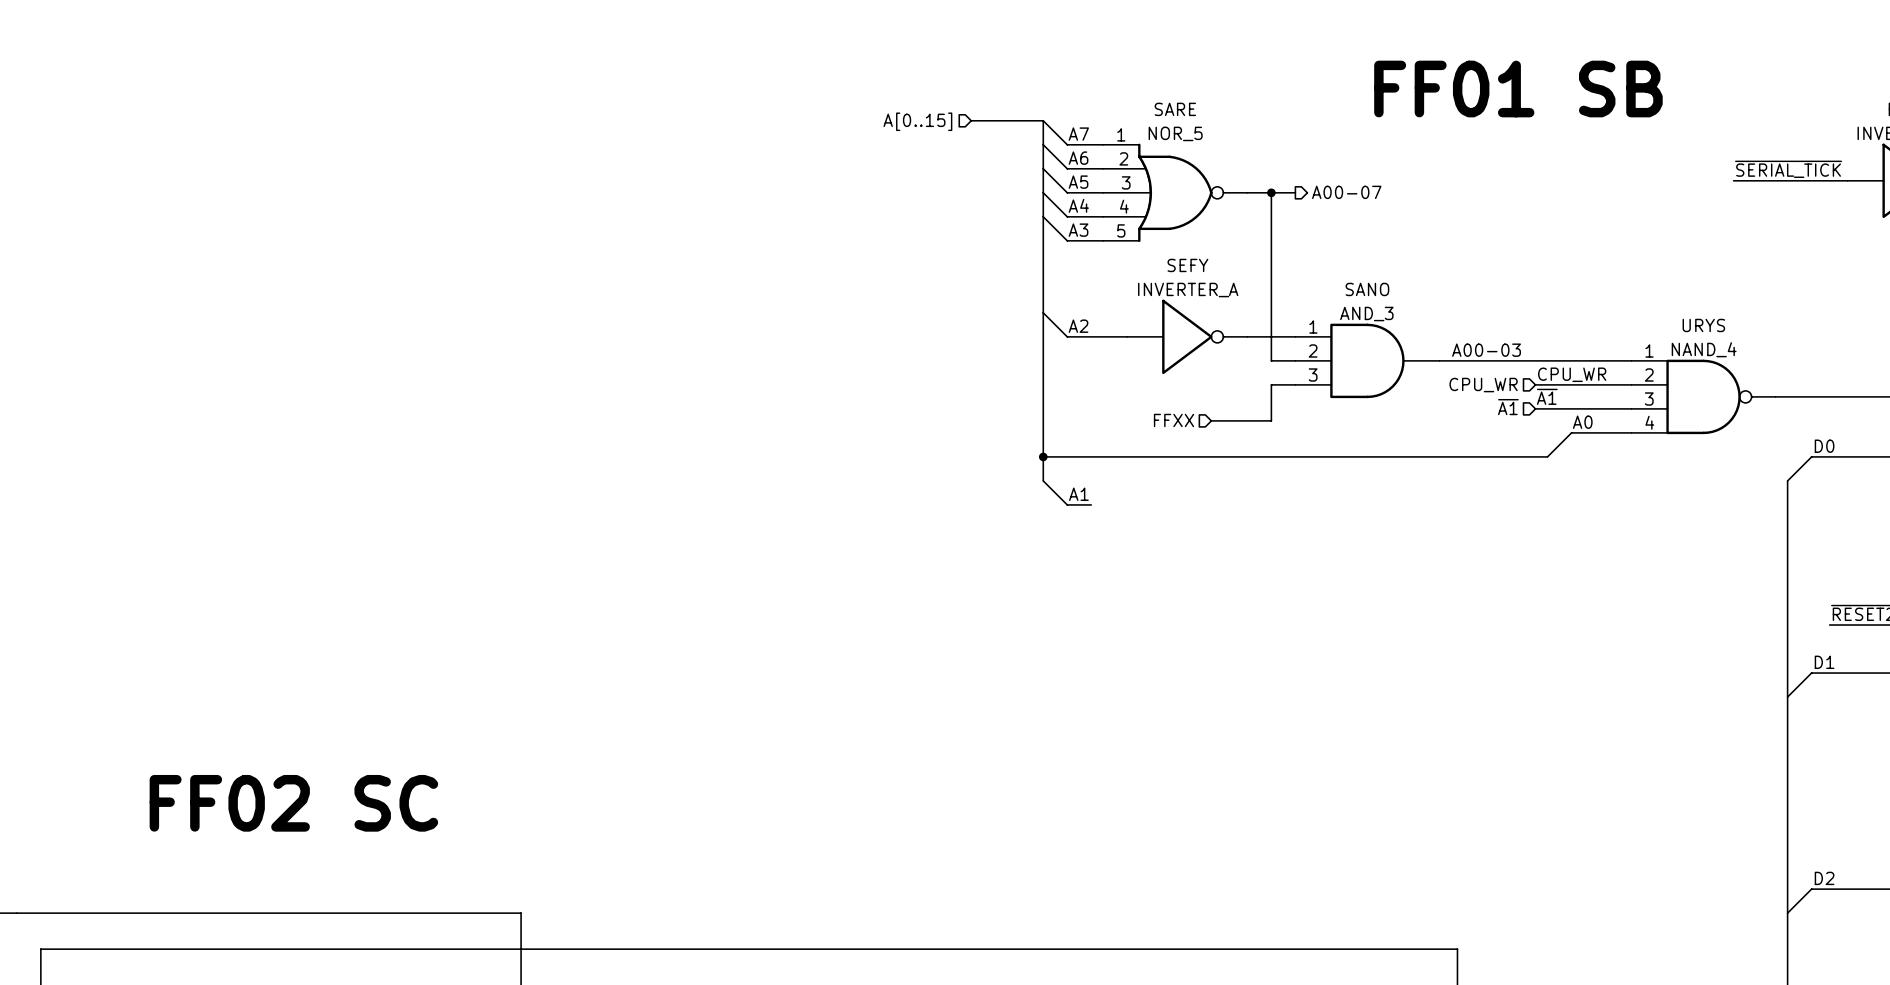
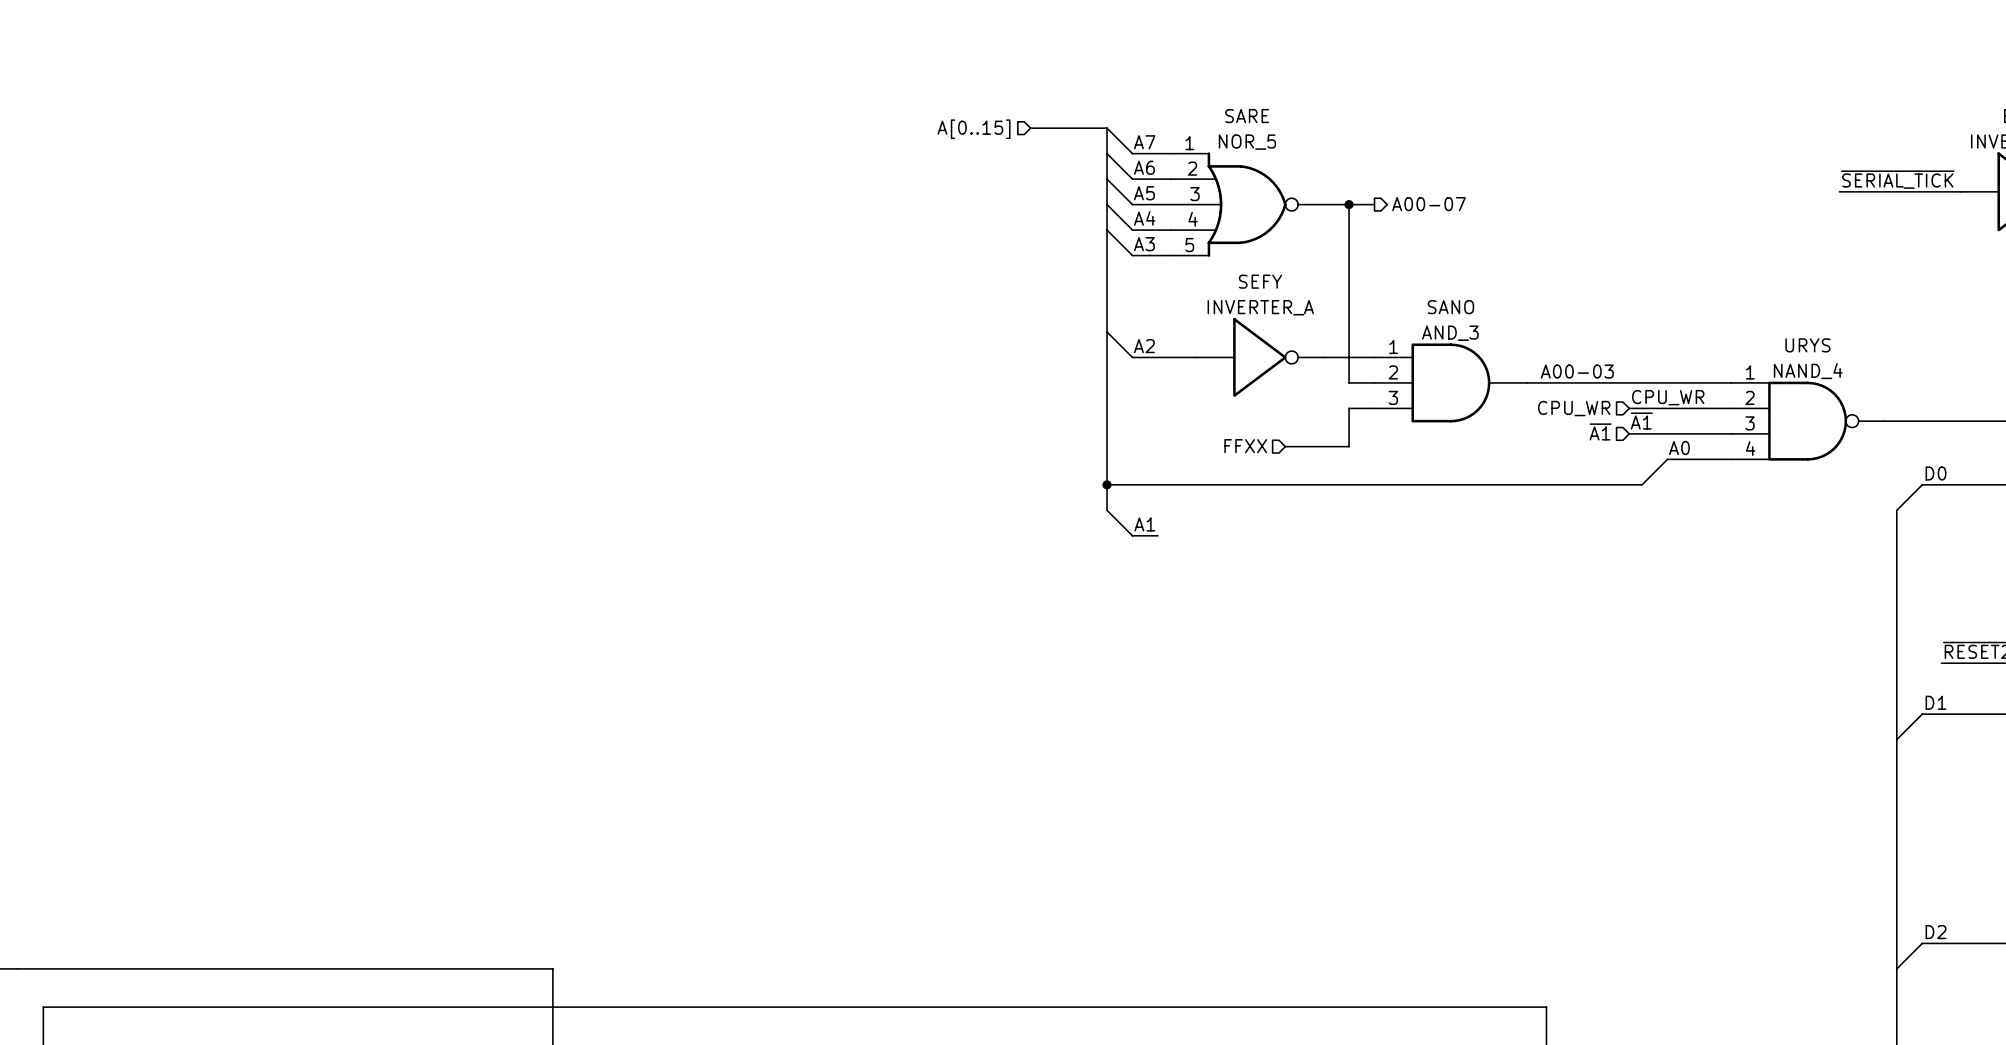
text: FF01 SB (1518, 89) -> none
text: FF02 SC (293, 803) -> none

